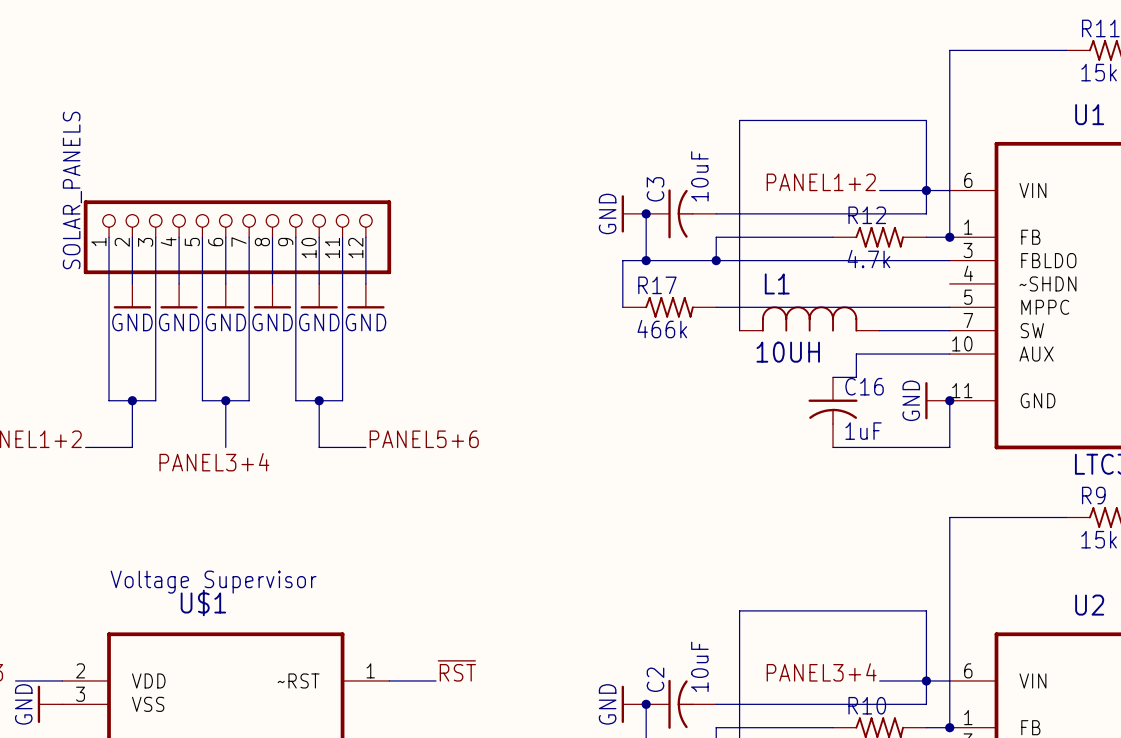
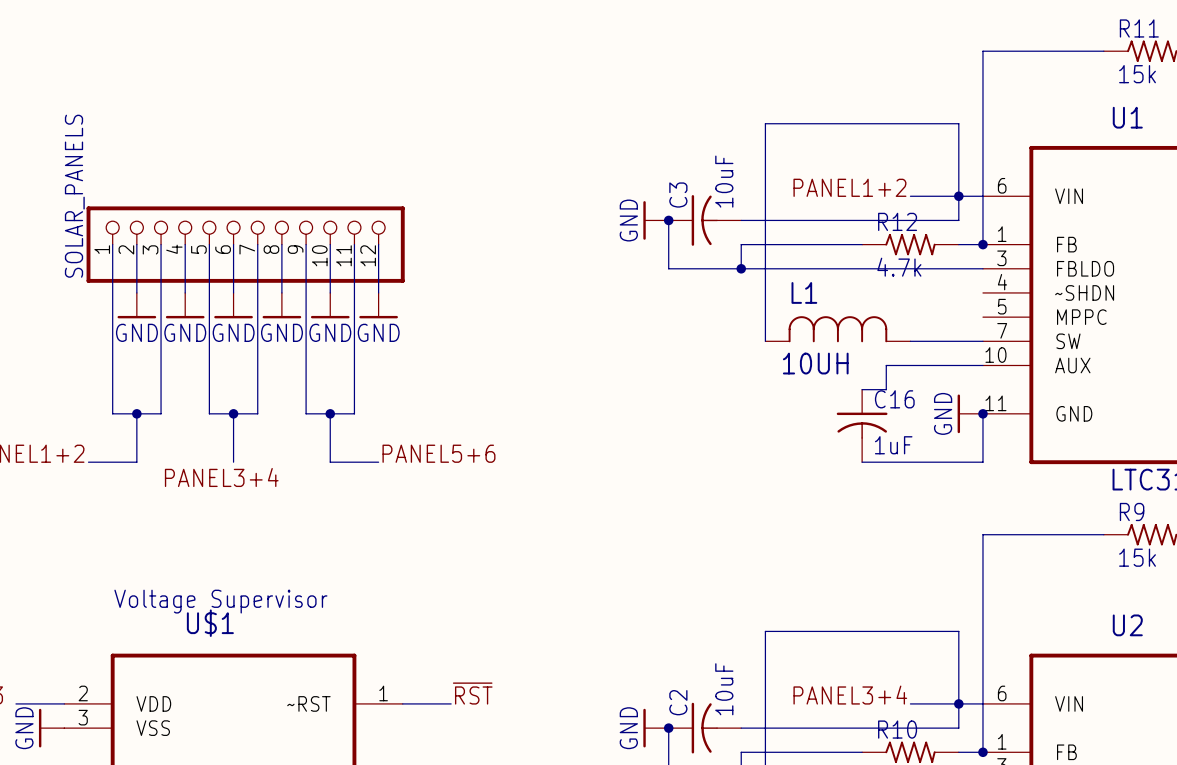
wire: (646, 260) (622, 260) (622, 307) -> none
junction: (646, 260) -> none
R17: 466k (669, 307) -> none
wire: (716, 307) (949, 307) -> none

